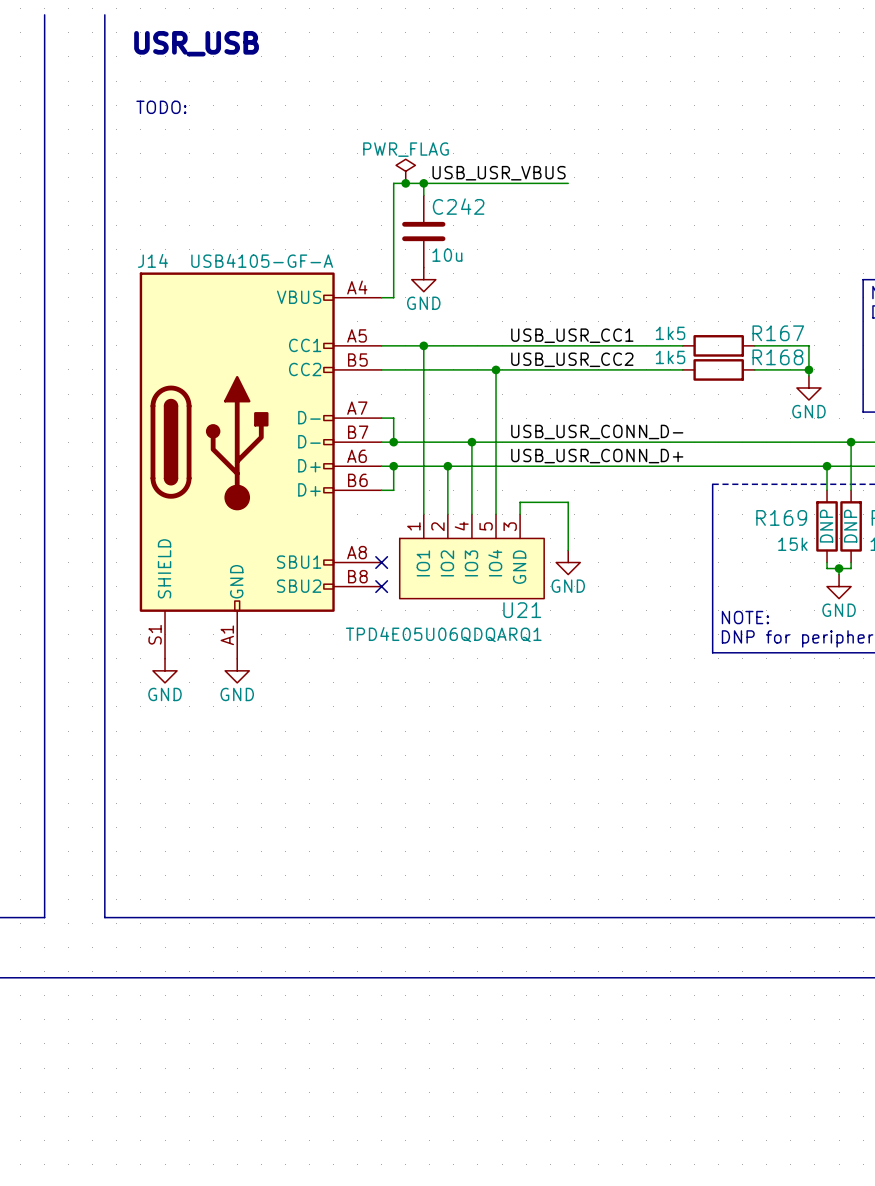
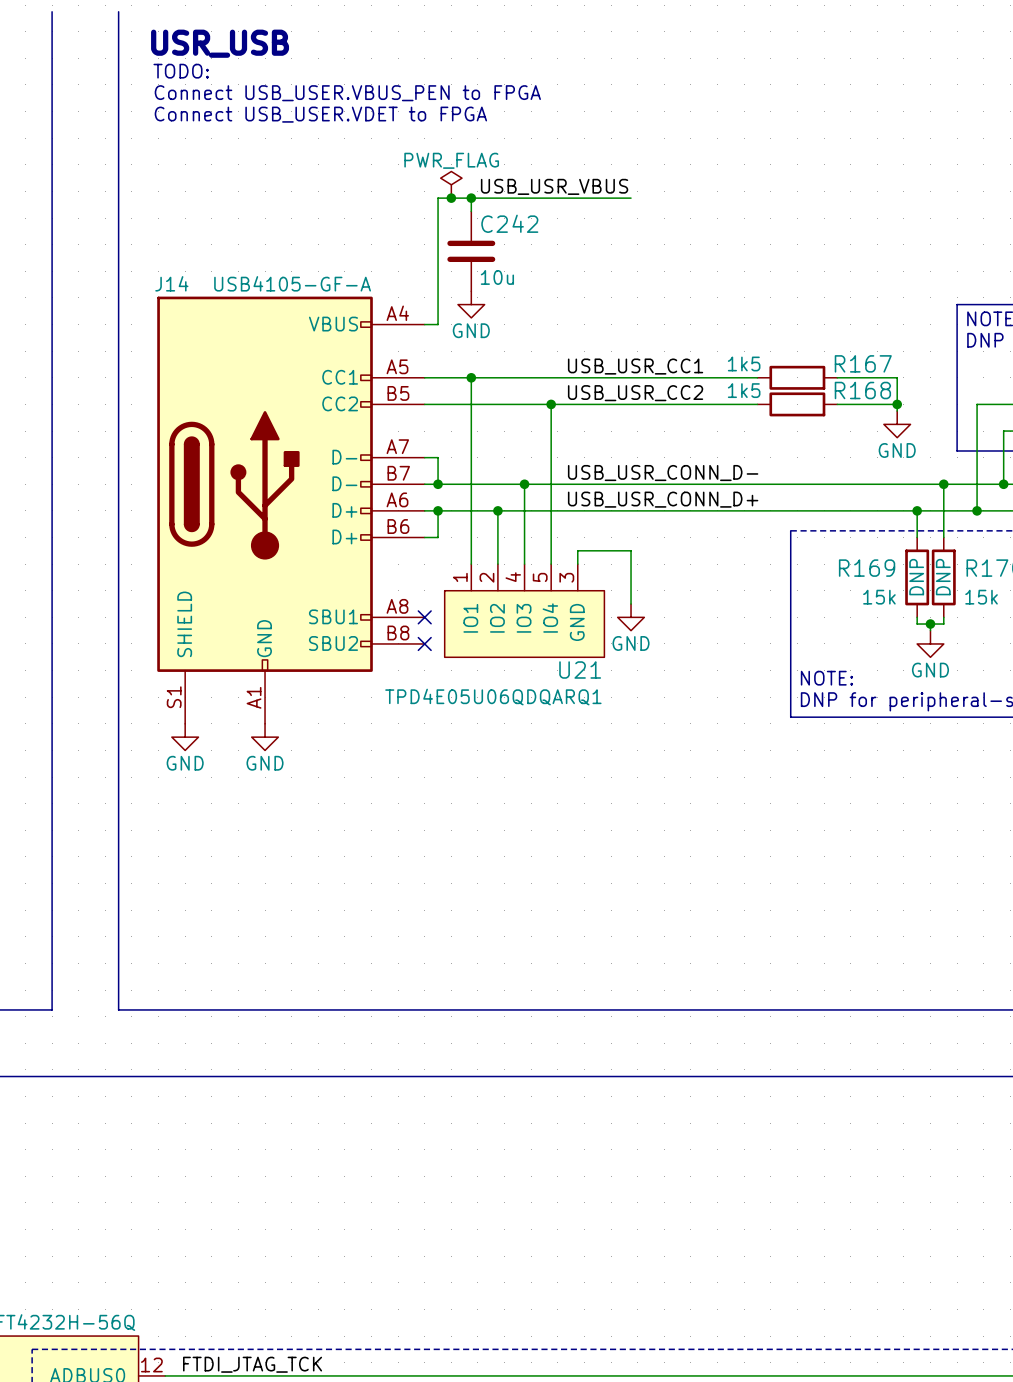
text: none -> TODO: (181, 71)
text: none -> Connect USB_USER.VBUS_PEN to FPGA (347, 93)
text: TODO: (161, 107) -> Connect USB_USER.VDET to FPGA (320, 114)

